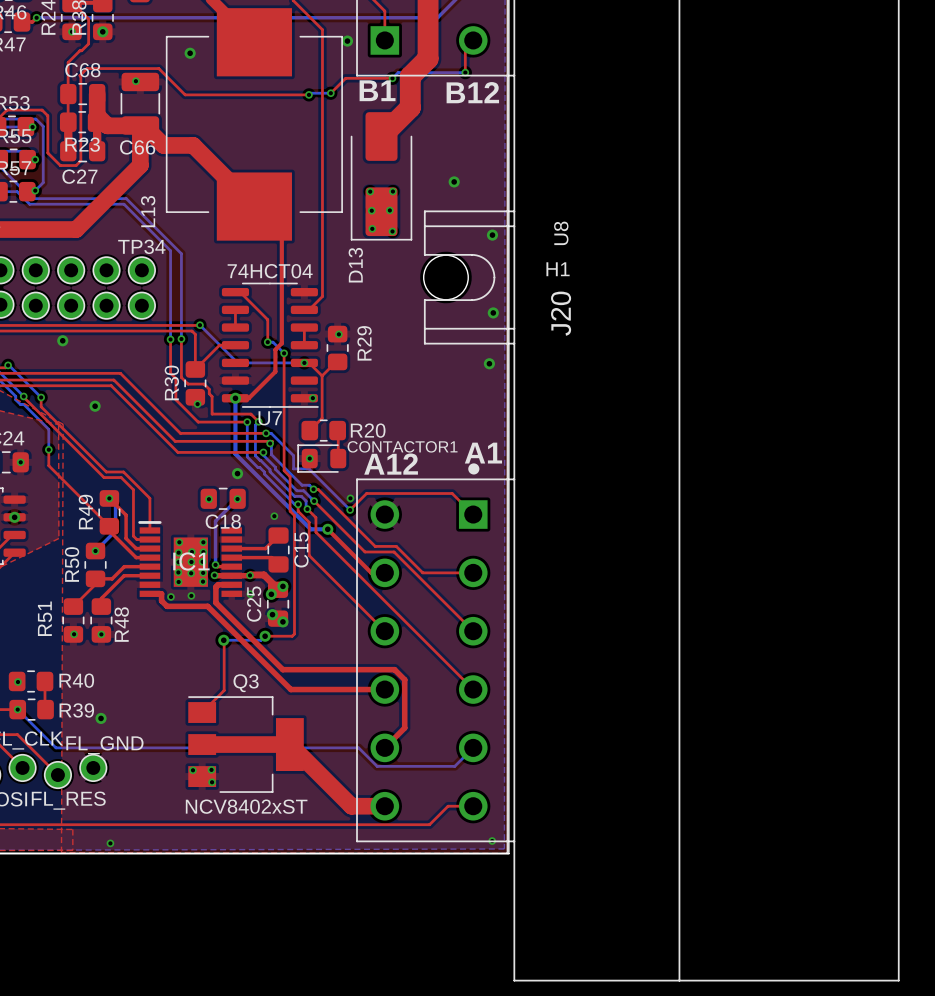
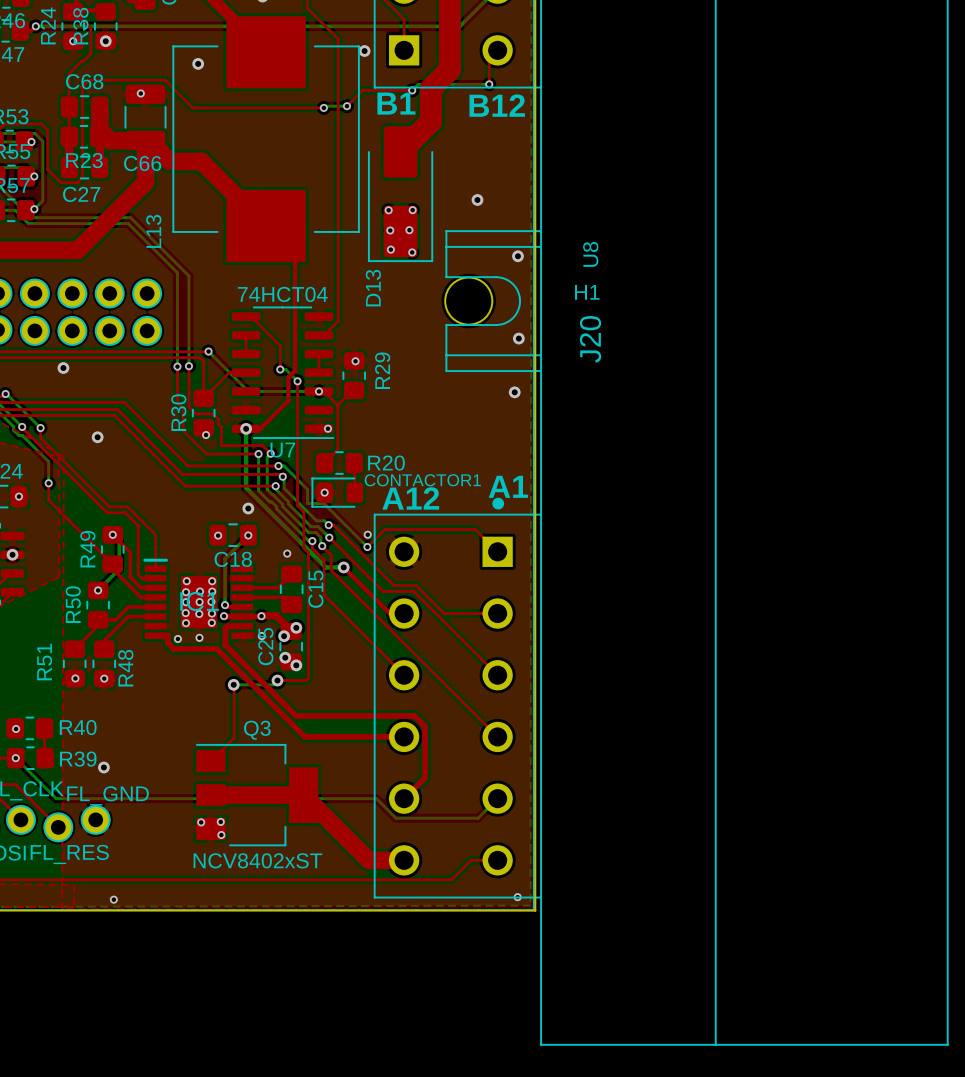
TP34 name: TP34 (141, 246) -> none

